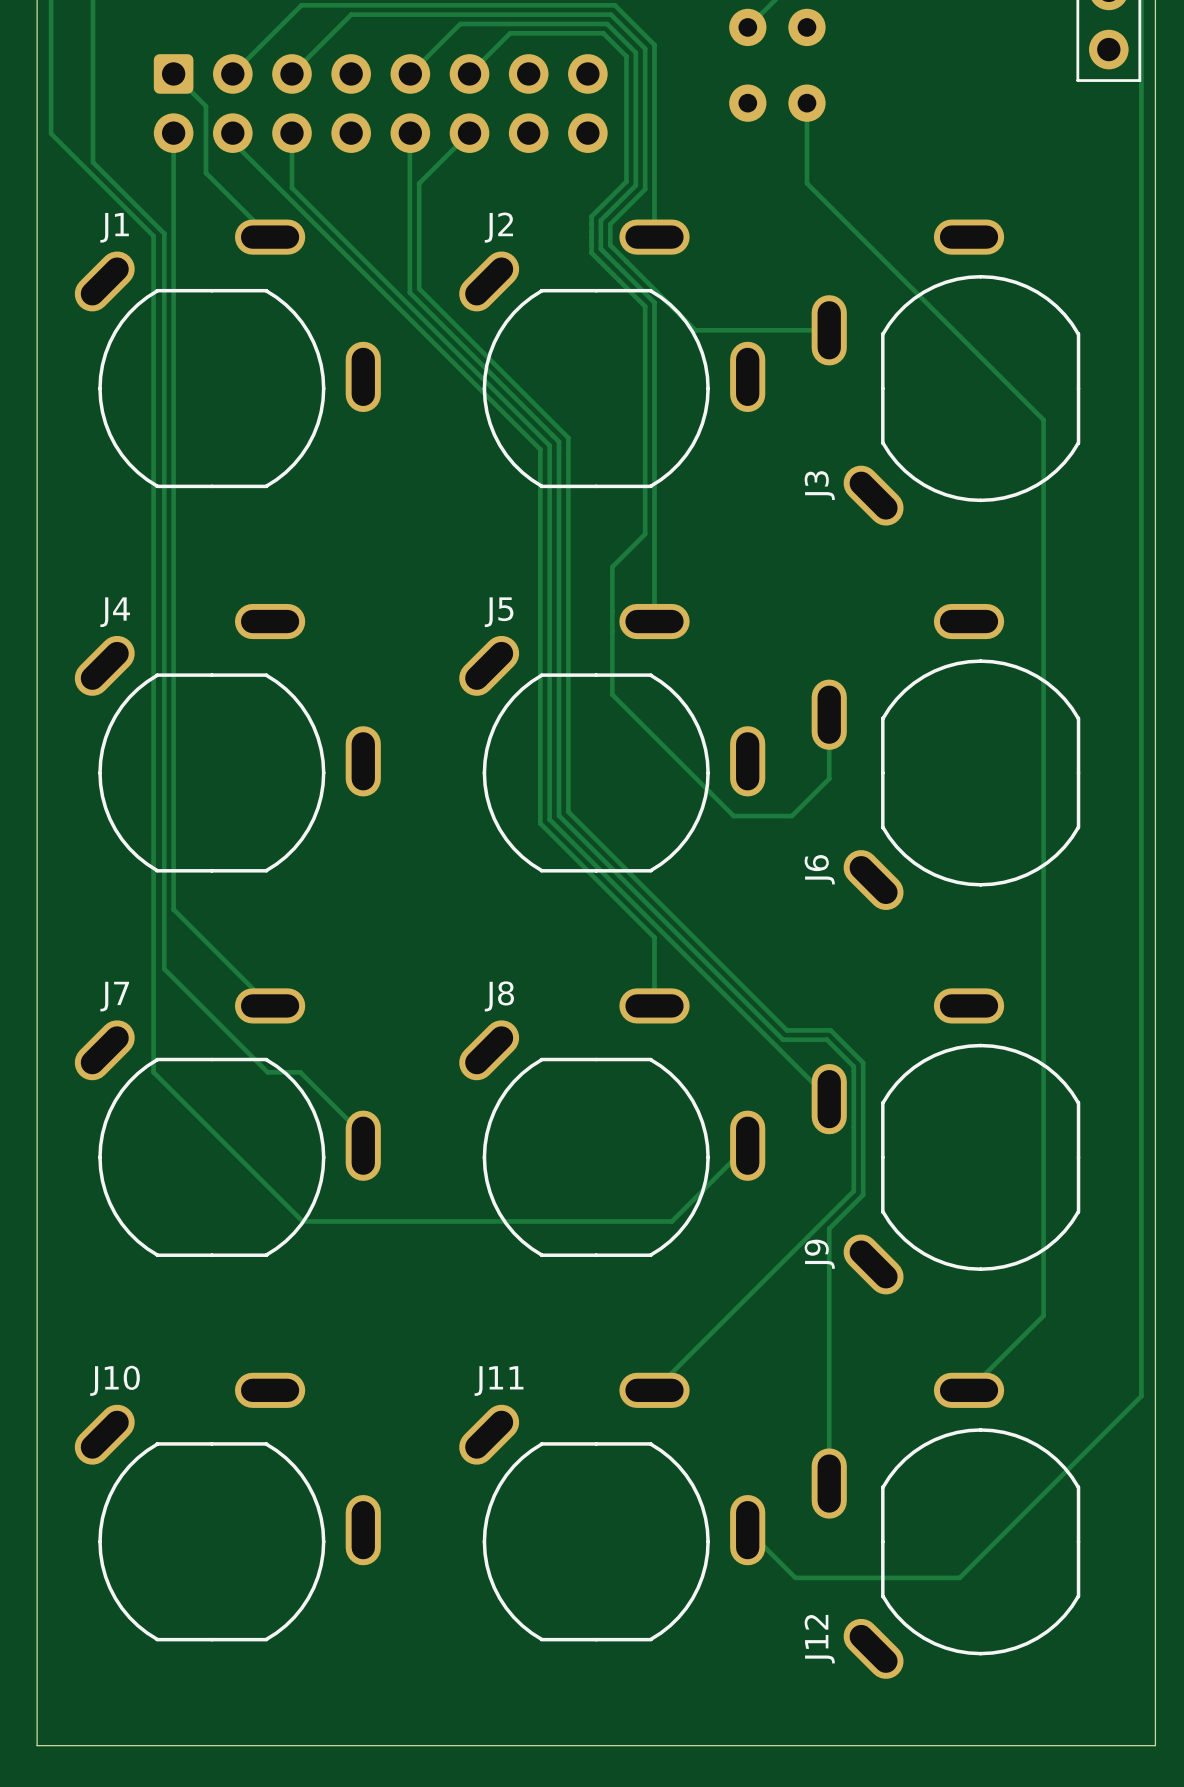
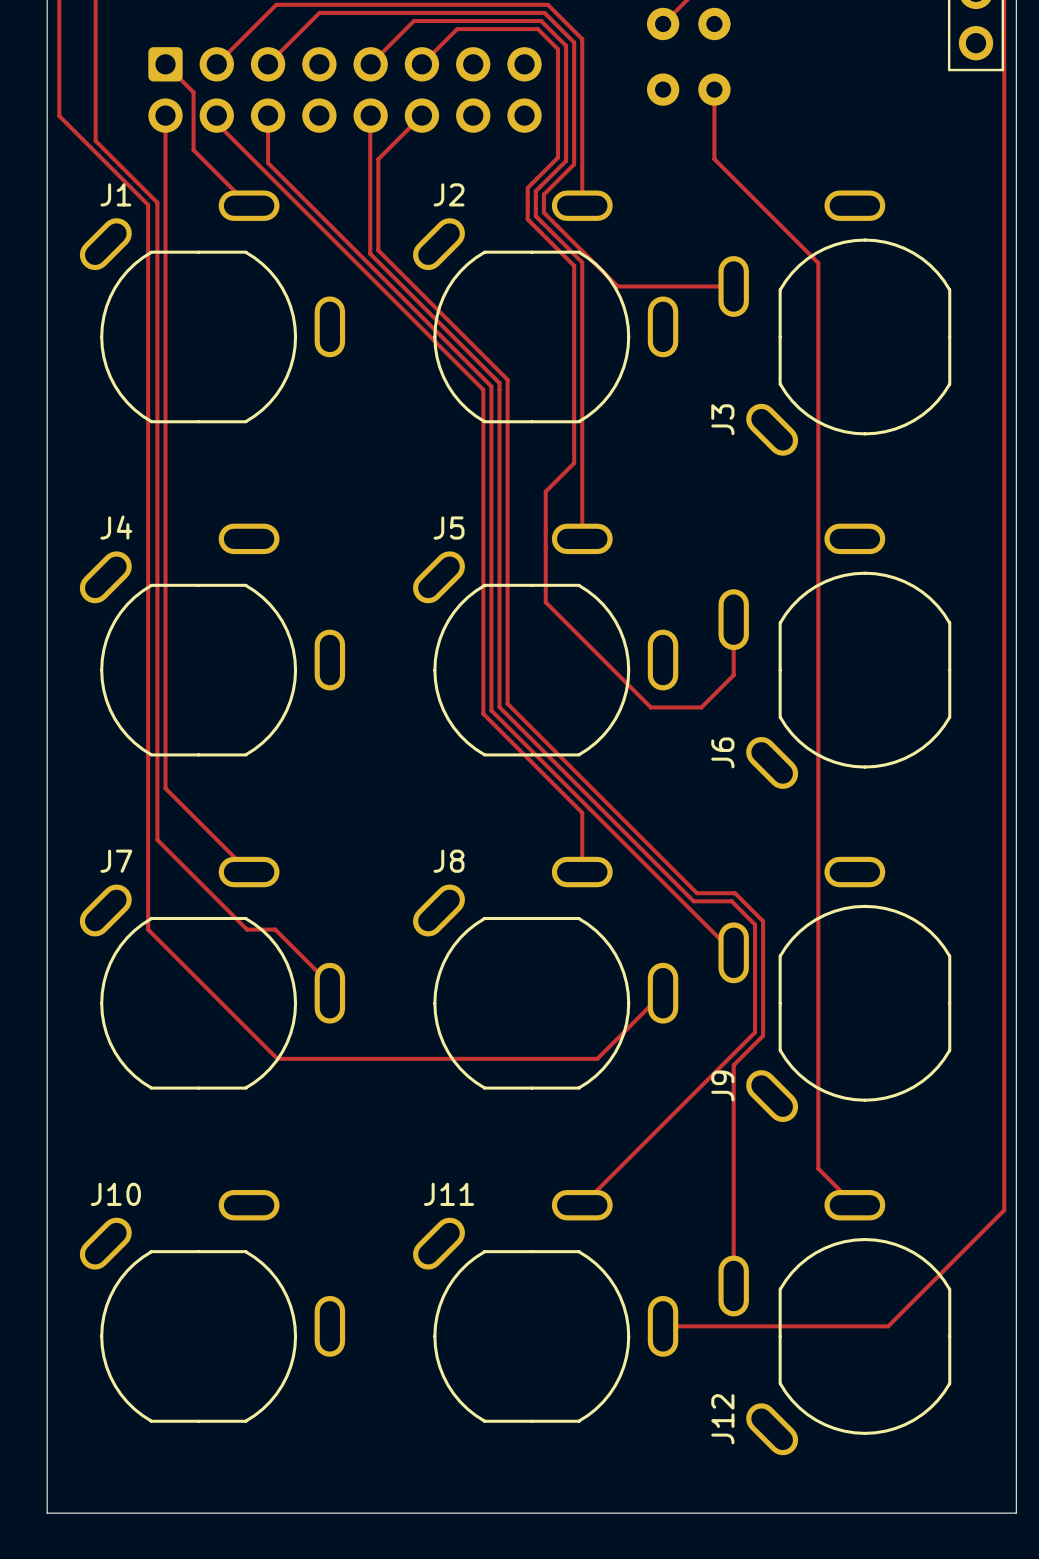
track: (926, 303) (1043, 419) (1043, 1315) (969, 1390) -> (818, 263) (818, 1168) (854, 1205)
track: (747, 1530) (795, 1577) (959, 1577) (1007, 1530) -> (663, 1326) (888, 1326)

